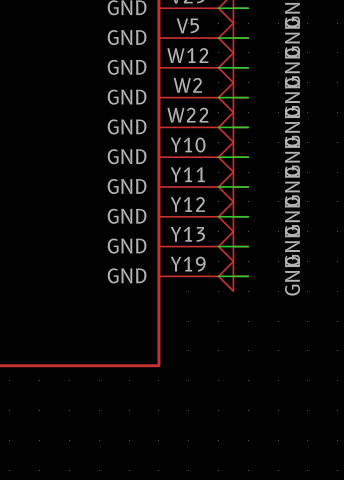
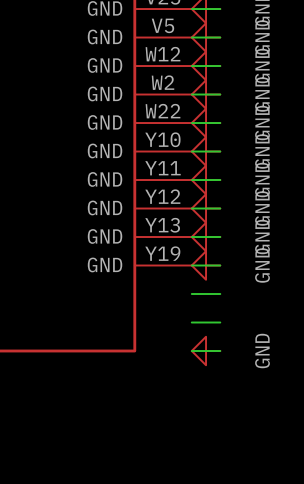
wire: none -> (191, 294) (220, 294)
wire: none -> (191, 322) (220, 322)
wire: none -> (191, 351) (220, 351)
power symbol: none -> GND (206, 351)

